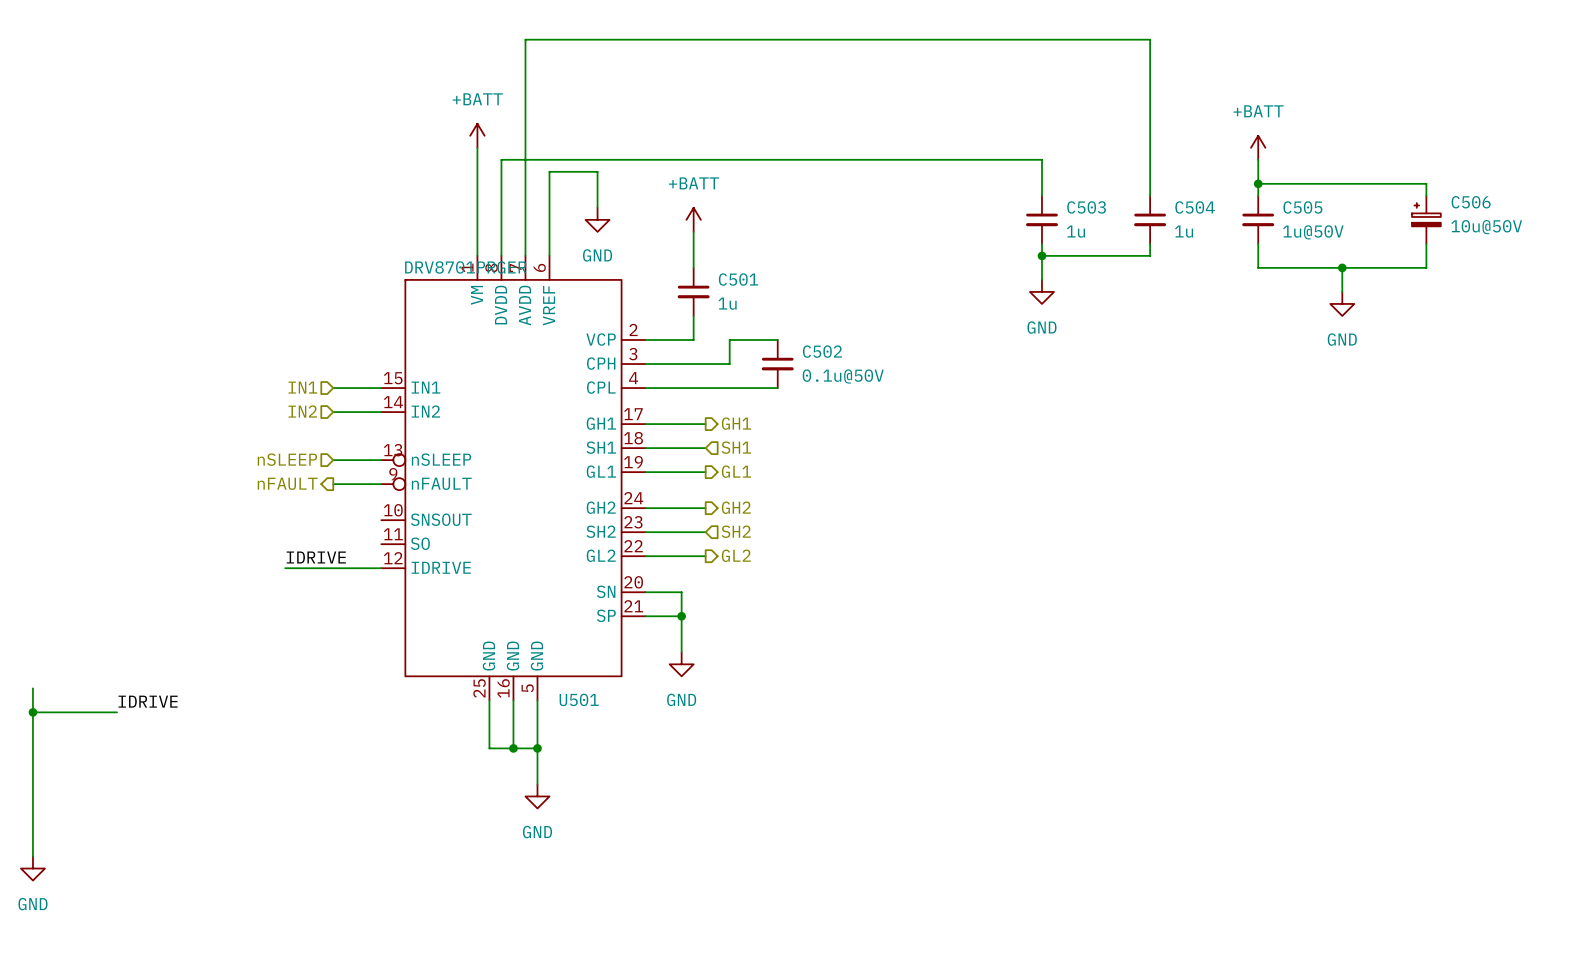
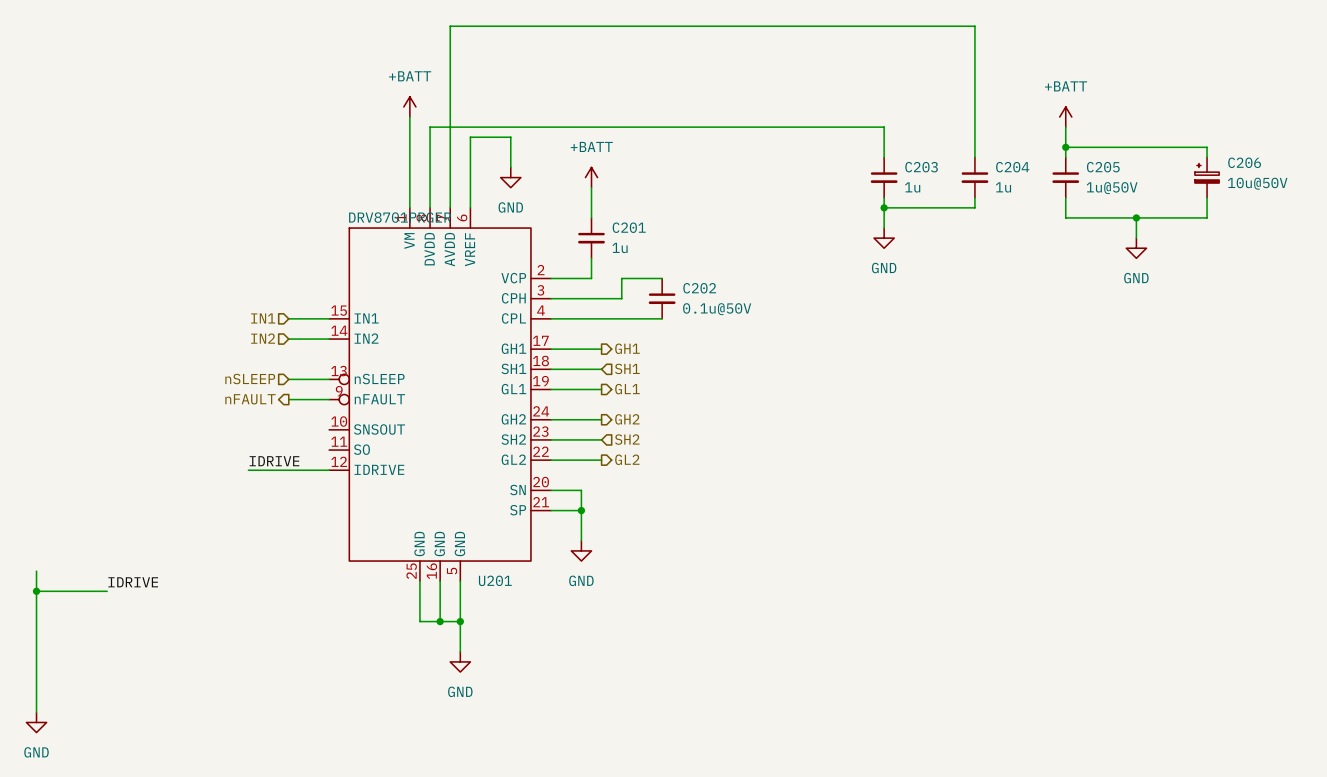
C506 name: C506 (1471, 202) -> C206 (1244, 162)
C503 name: C503 (1086, 207) -> C203 (921, 167)
C504 name: C504 (1195, 207) -> C204 (1012, 167)
C505 name: C505 (1302, 207) -> C205 (1103, 167)
C501 name: C501 (738, 279) -> C201 (629, 227)
C502 name: C502 (822, 351) -> C202 (699, 288)
U501 name: U501 (579, 699) -> U201 (495, 580)

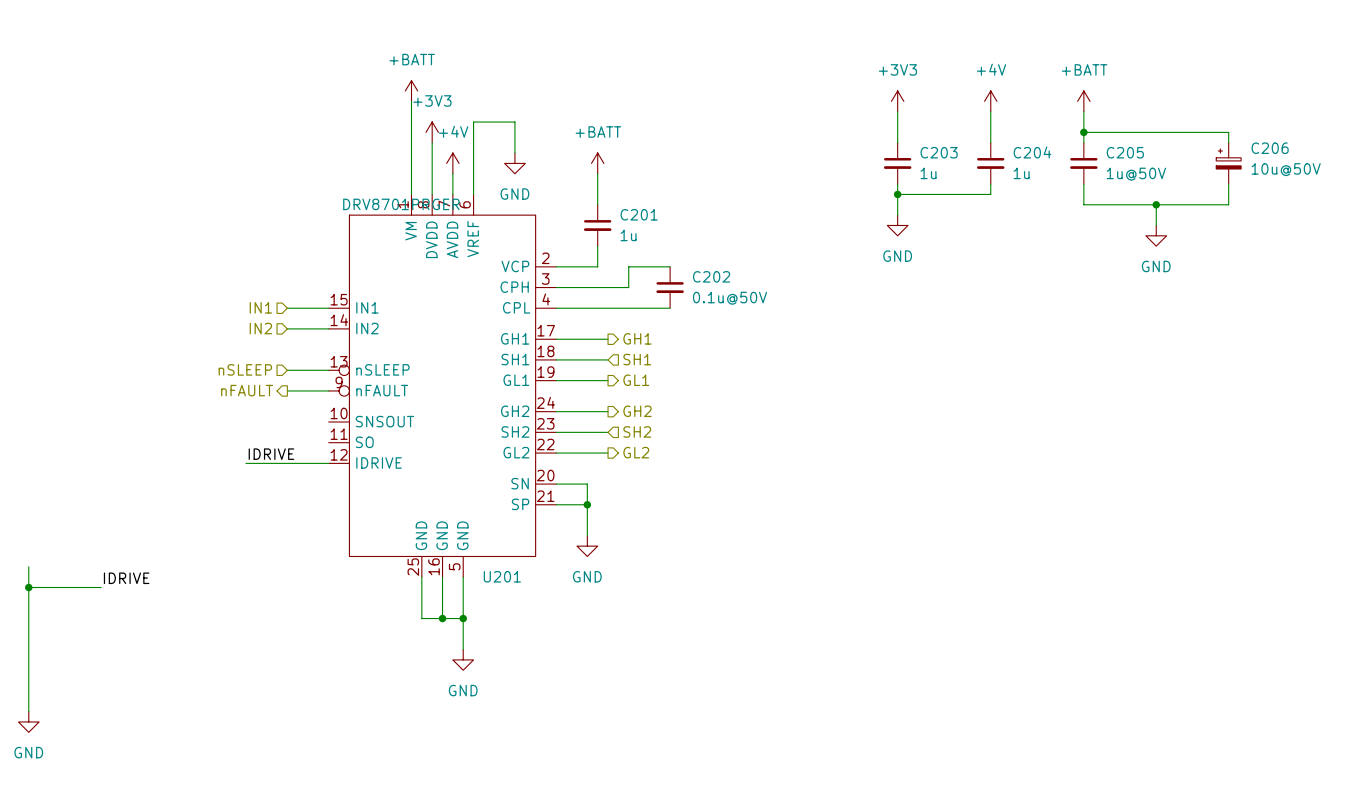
power symbol: none -> +3V3 (897, 101)
power symbol: none -> +4V (990, 101)
wire: (884, 127) (430, 127) (430, 157) -> none
wire: (974, 127) (974, 26) (450, 26) (450, 187) -> none
power symbol: none -> +3V3 (432, 132)
power symbol: none -> +4V (452, 163)

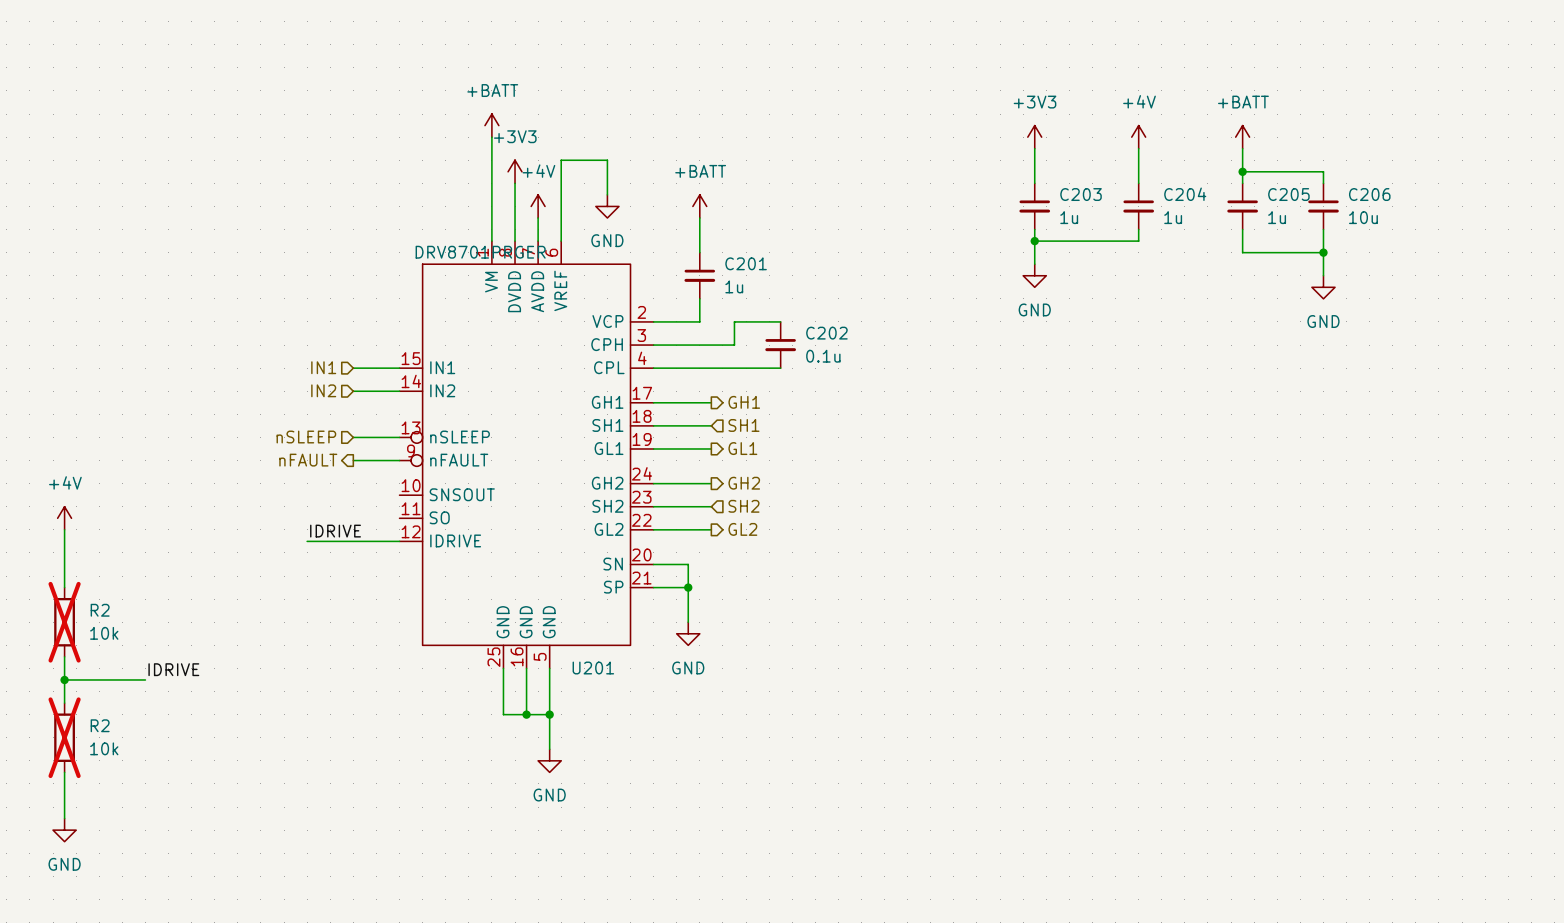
wire: (1156, 132) (1228, 132) (1228, 142) -> (1323, 171) (1323, 183)
C206 symbol: [1216, 142, 1242, 185] -> [1308, 183, 1339, 230]
C206 value: 10u@50V (1286, 169) -> 10u (1363, 217)
C205 value: 1u@50V (1136, 174) -> 1u (1277, 217)
wire: (1228, 184) (1228, 204) (1156, 204) -> (1323, 229) (1323, 252)
C202 value: 0.1u@50V (730, 298) -> 0.1u (823, 356)
power symbol: none -> +4V (64, 518)
wire: none -> (64, 529) (64, 587)
R2: none -> 10k (64, 622)
R2: none -> 10k (64, 737)

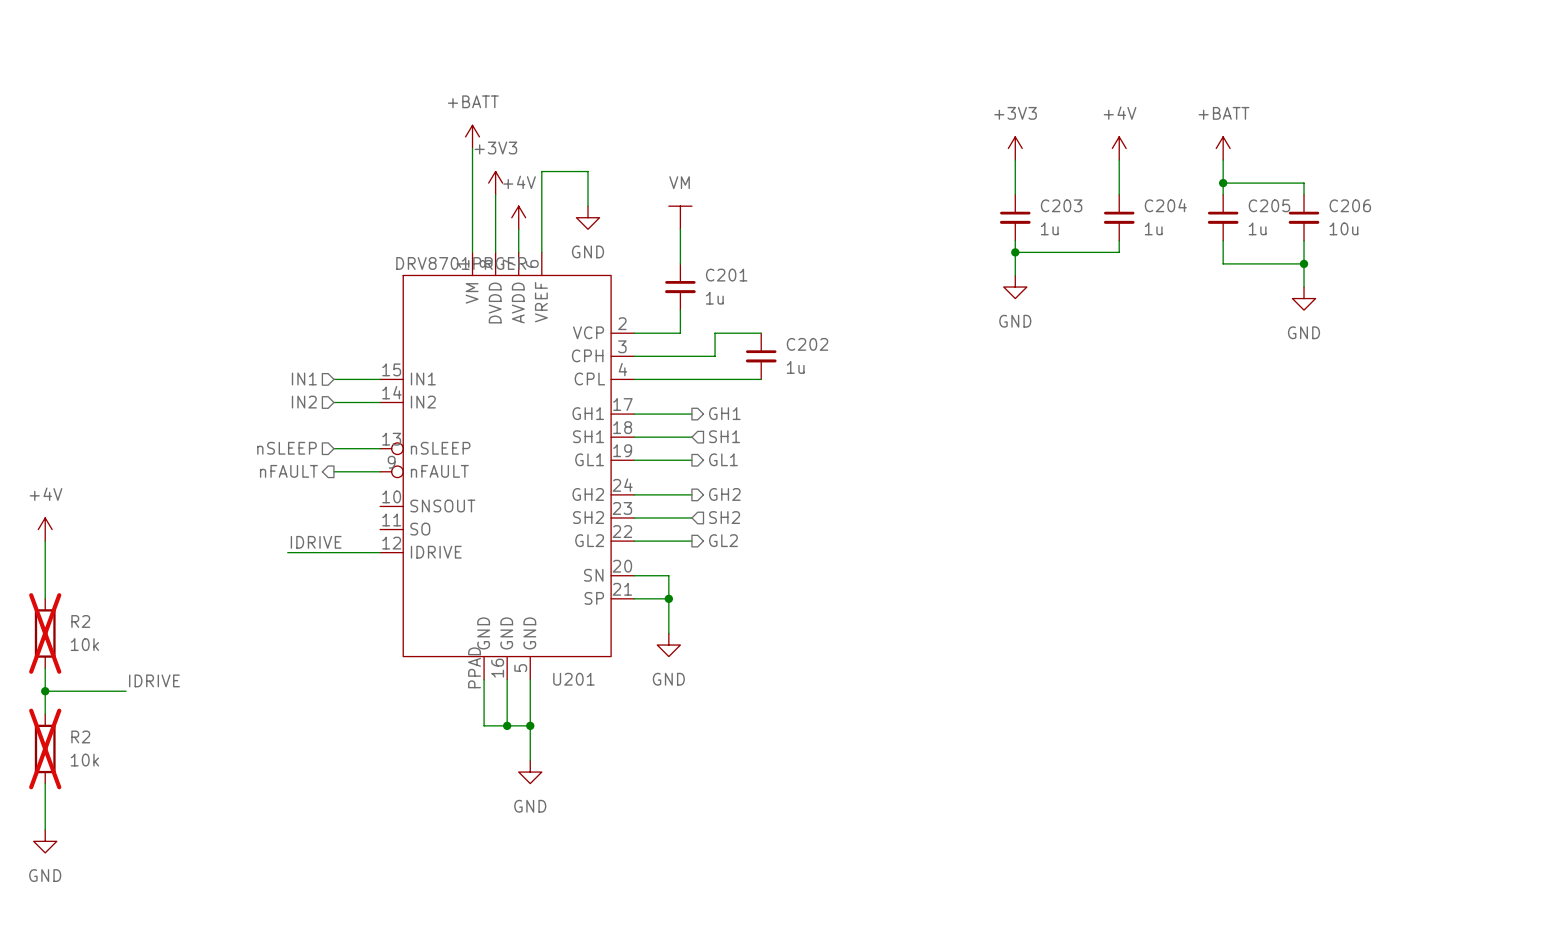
power symbol: +BATT (699, 206) -> VM (680, 217)
C202 value: 0.1u (823, 356) -> 1u (795, 367)
U201 pin number: 25 (493, 657) -> PPAD (474, 667)

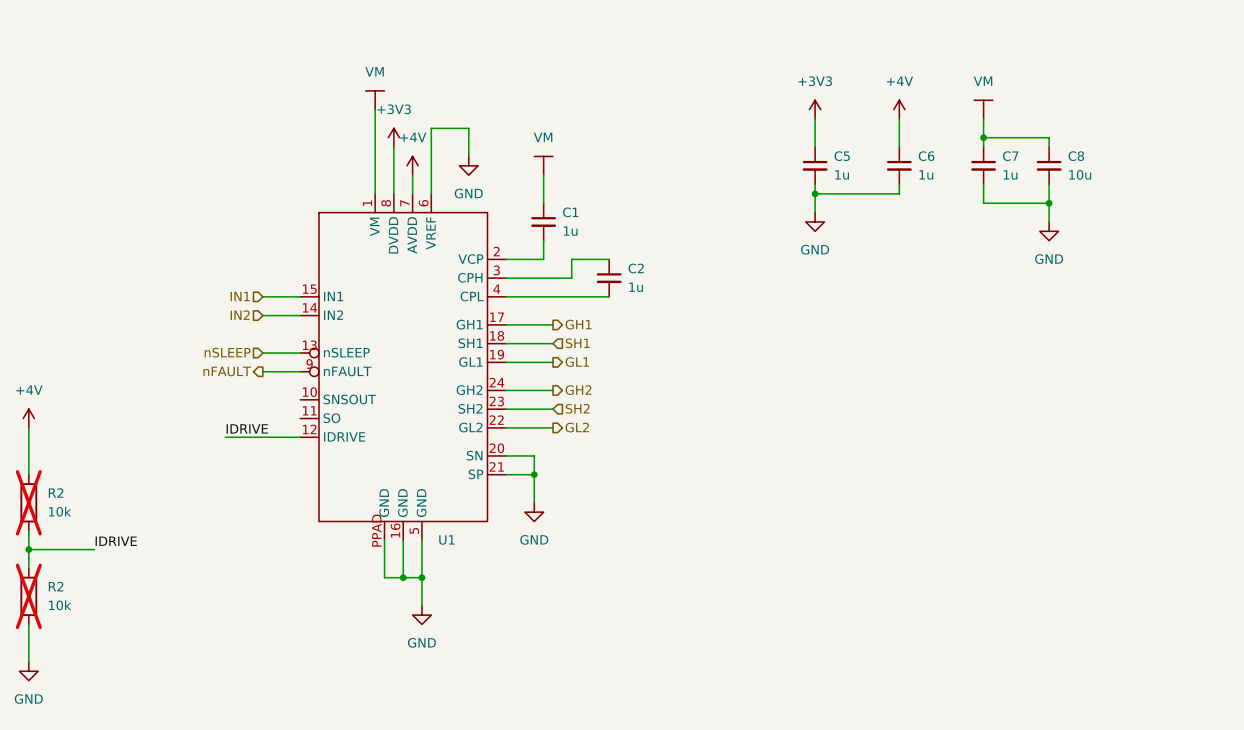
power symbol: +BATT (472, 136) -> VM (375, 100)
power symbol: +BATT (1223, 148) -> VM (983, 109)
C203 name: C203 (1061, 205) -> C5 (842, 156)
C204 name: C204 (1165, 205) -> C6 (926, 156)
C205 name: C205 (1269, 205) -> C7 (1010, 156)
C206 name: C206 (1350, 205) -> C8 (1076, 156)
U201 value: DRV8701PRGER (461, 263) -> none
C201 name: C201 (726, 275) -> C1 (570, 212)
C202 name: C202 (807, 344) -> C2 (636, 268)
U201 name: U201 (573, 679) -> U1 (446, 539)

